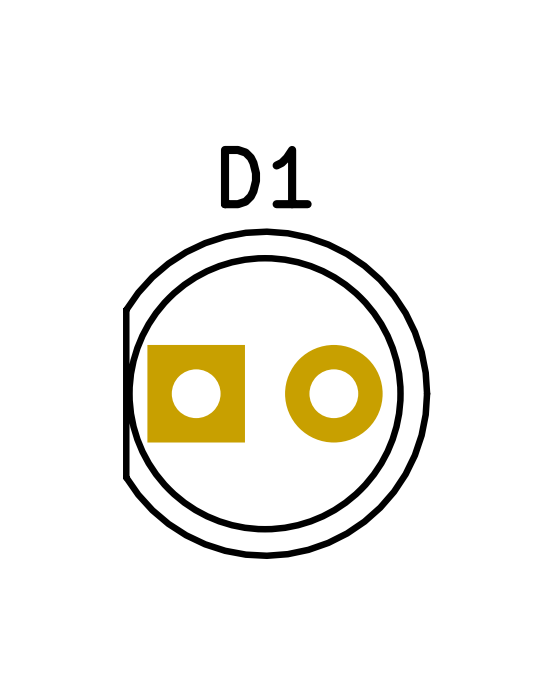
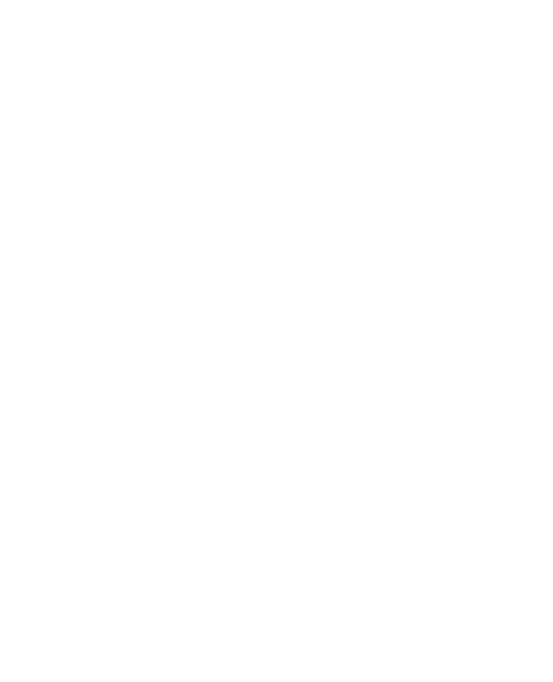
D1: (276, 393) -> none

